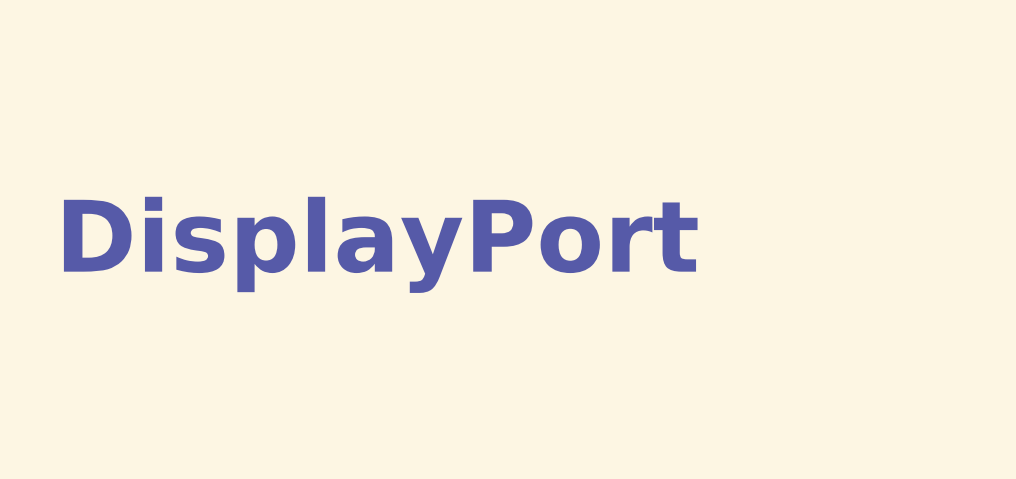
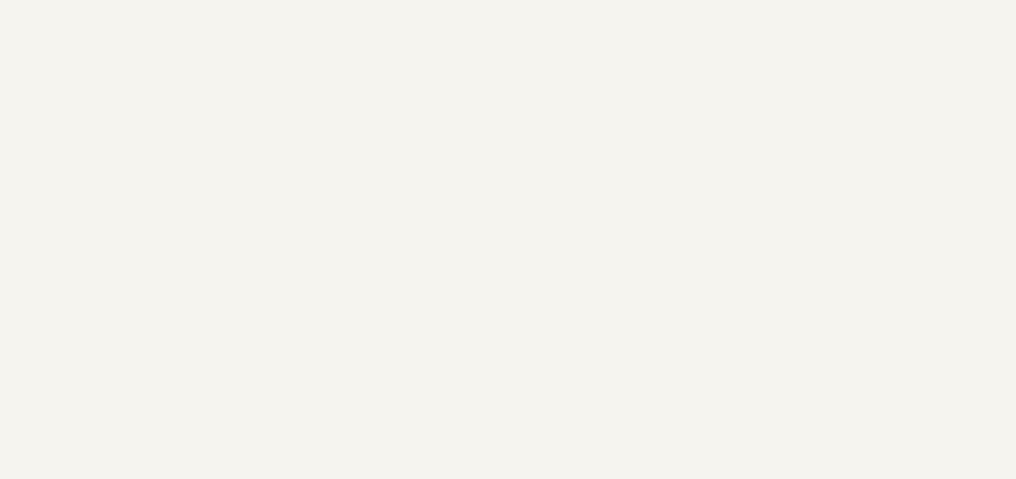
text: DisplayPort (380, 244) -> none

